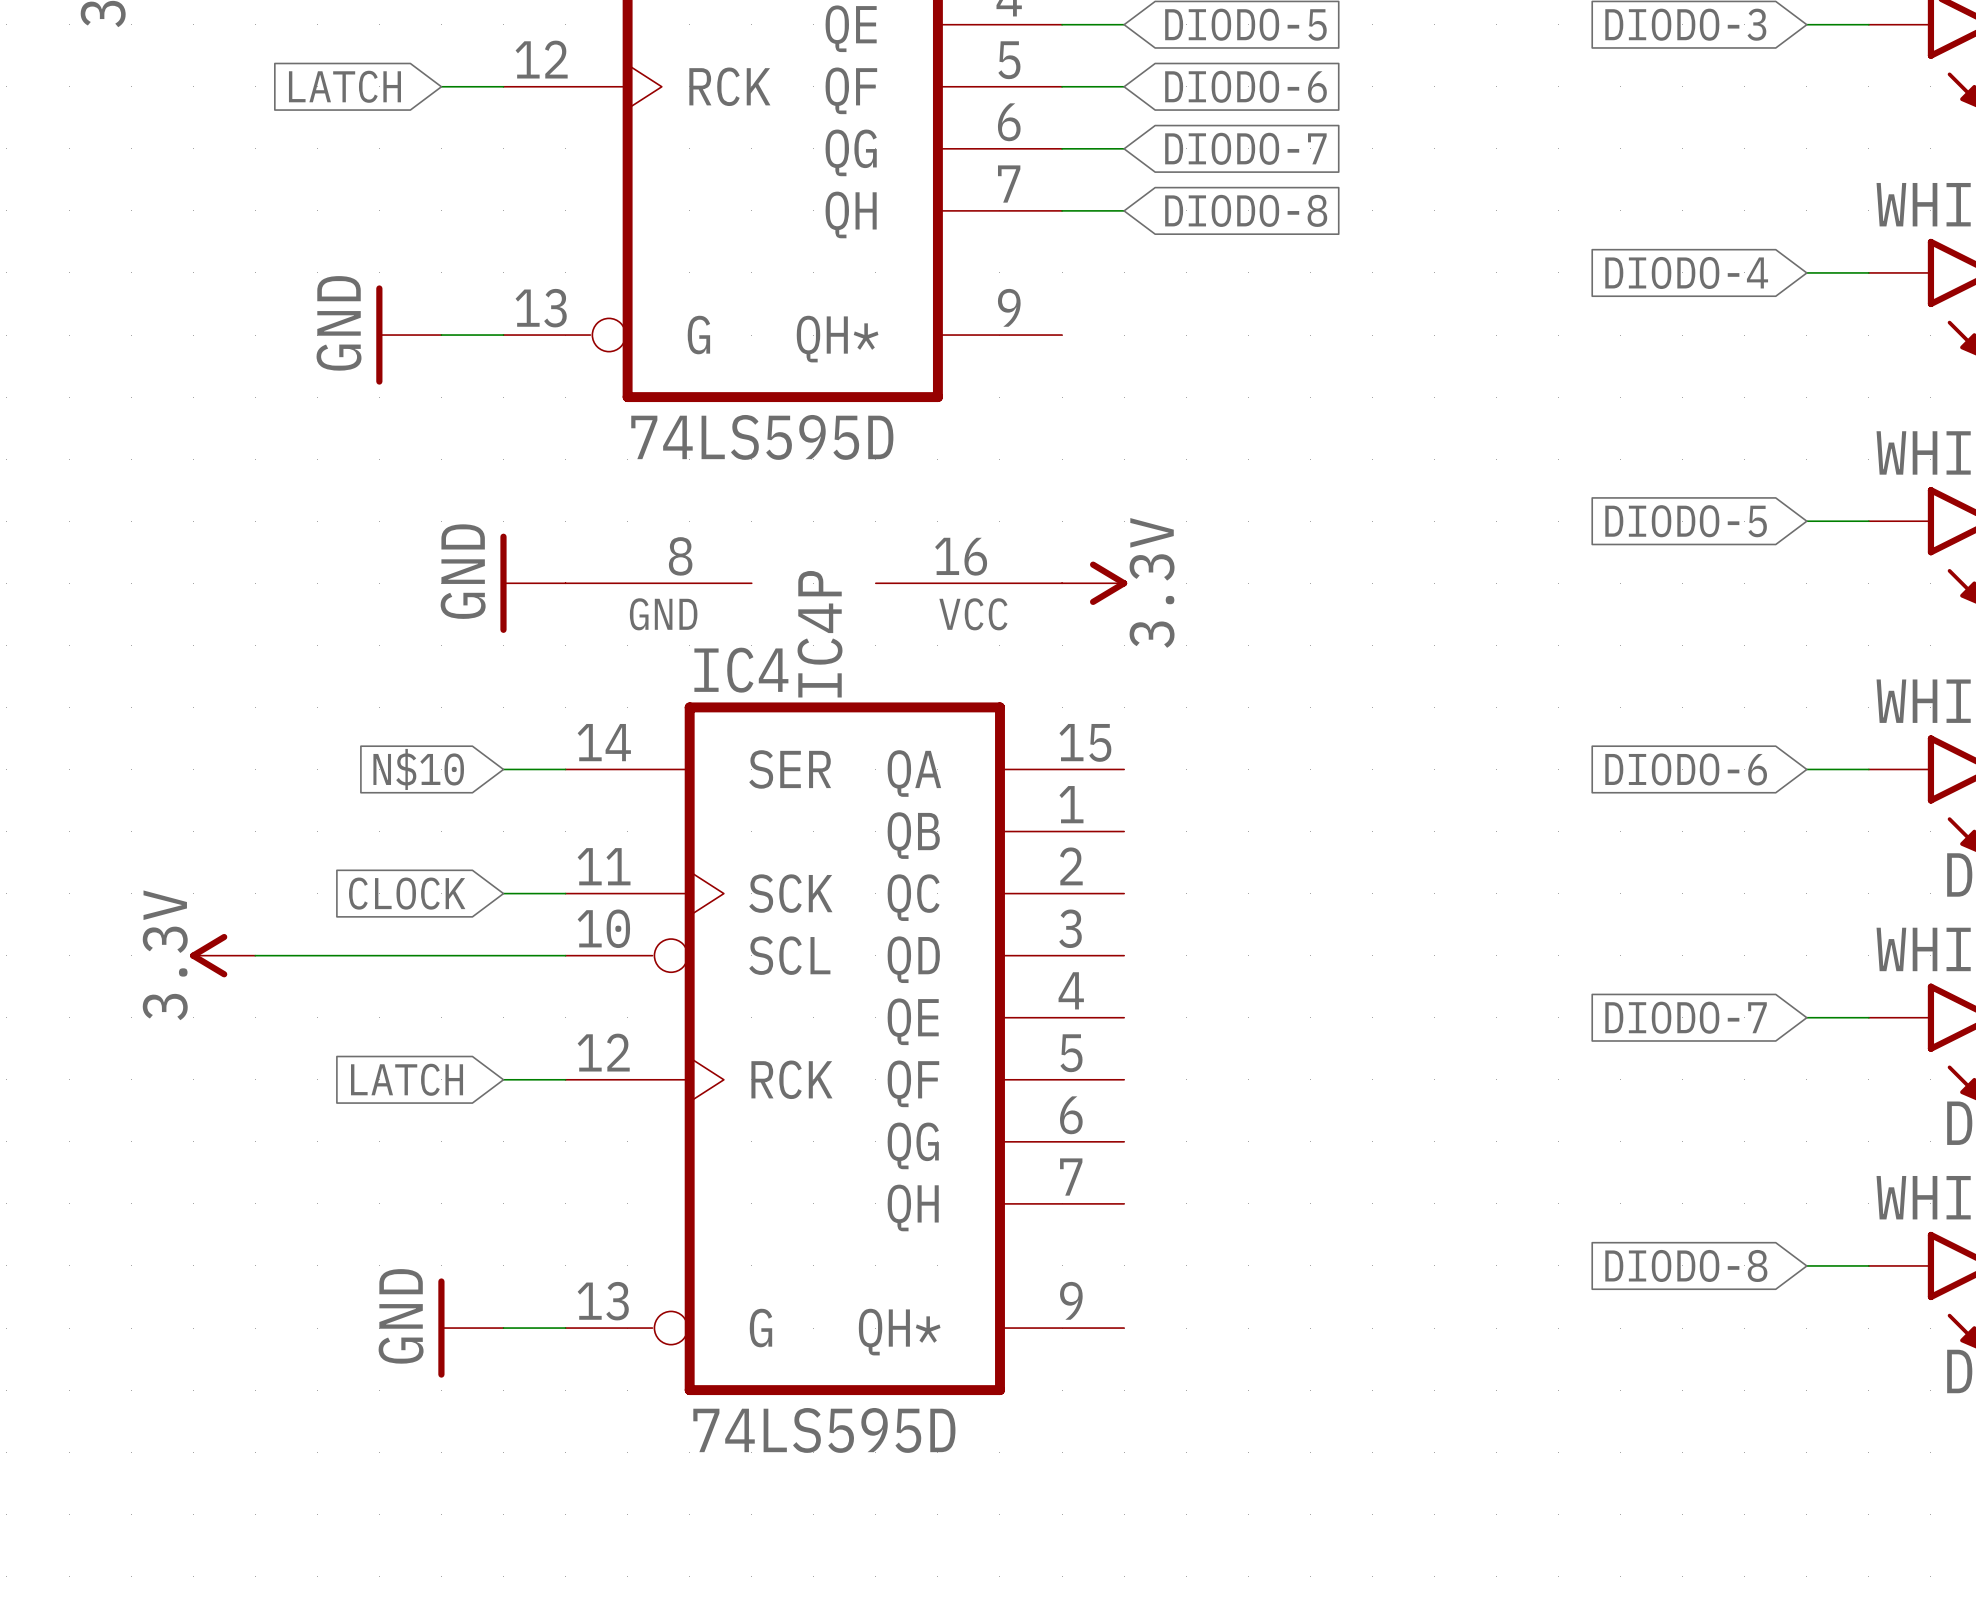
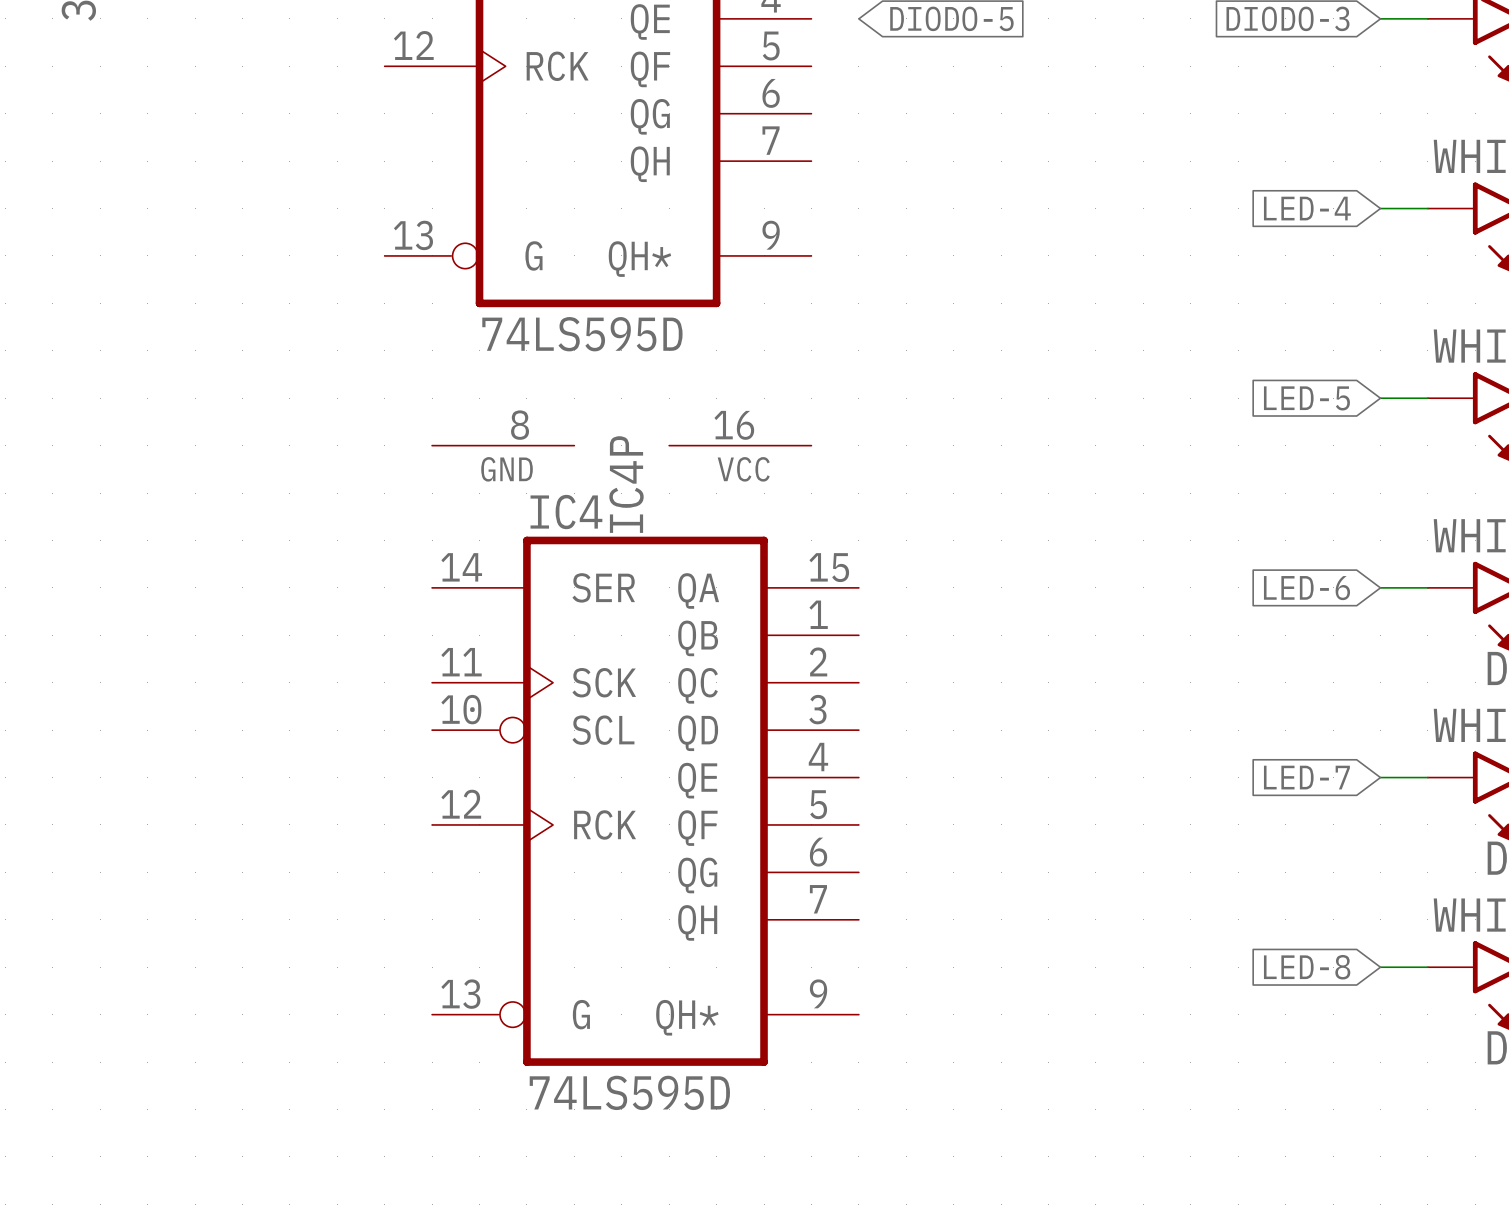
wire: (1062, 24) (1124, 24) -> none
global label: LATCH (344, 86) -> none
wire: (441, 86) (503, 86) -> none
wire: (1062, 86) (1124, 86) -> none
global label: DIODO-6 (1246, 86) -> none
wire: (1062, 148) (1124, 148) -> none
global label: DIODO-7 (1245, 148) -> none
wire: (1062, 210) (1124, 210) -> none
global label: DIODO-8 (1246, 210) -> none
global label: DIODO-4 (1686, 272) -> LED-4 (1307, 208)
power symbol: GND (408, 335) -> none
wire: (441, 335) (503, 335) -> none
global label: DIODO-5 (1686, 521) -> LED-5 (1306, 398)
power symbol: GND (532, 583) -> none
power symbol: 3.3V (1094, 583) -> none
global label: N$10 (418, 769) -> none
wire: (503, 769) (565, 769) -> none
global label: DIODO-6 (1686, 769) -> LED-6 (1306, 588)
global label: CLOCK (407, 893) -> none
wire: (503, 893) (565, 893) -> none
power symbol: 3.3V (222, 955) -> none
wire: (255, 955) (565, 955) -> none
global label: DIODO-7 (1686, 1017) -> LED-7 (1306, 777)
global label: LATCH (407, 1079) -> none
wire: (503, 1079) (565, 1079) -> none
global label: DIODO-8 (1686, 1265) -> LED-8 (1307, 967)
power symbol: GND (470, 1328) -> none
wire: (503, 1328) (565, 1328) -> none

